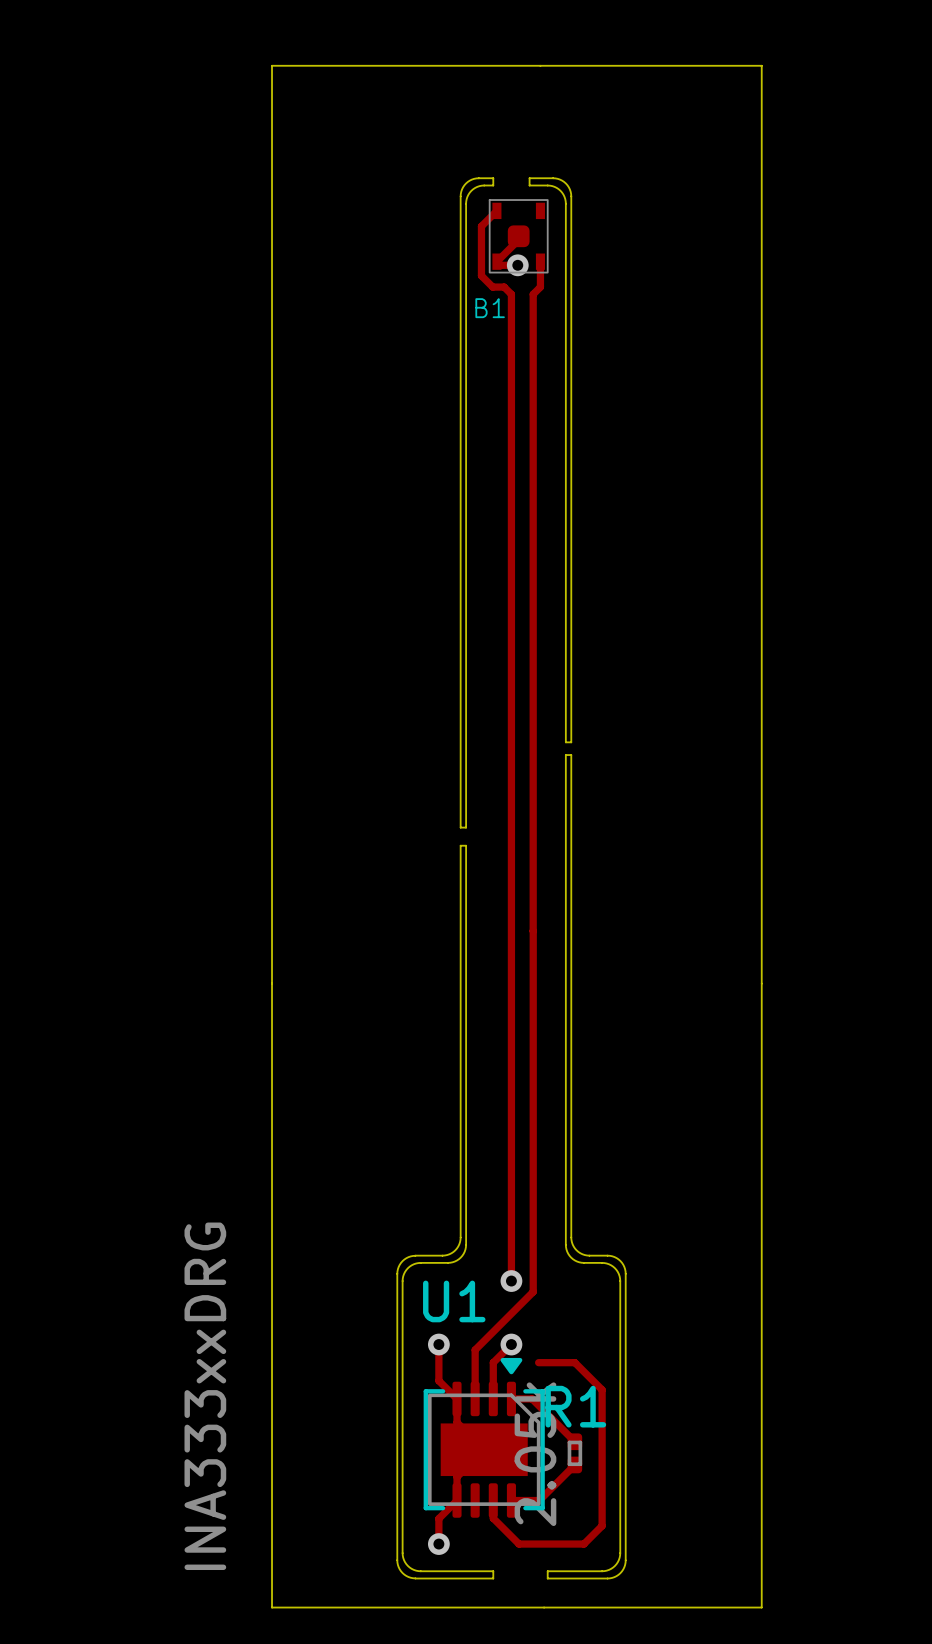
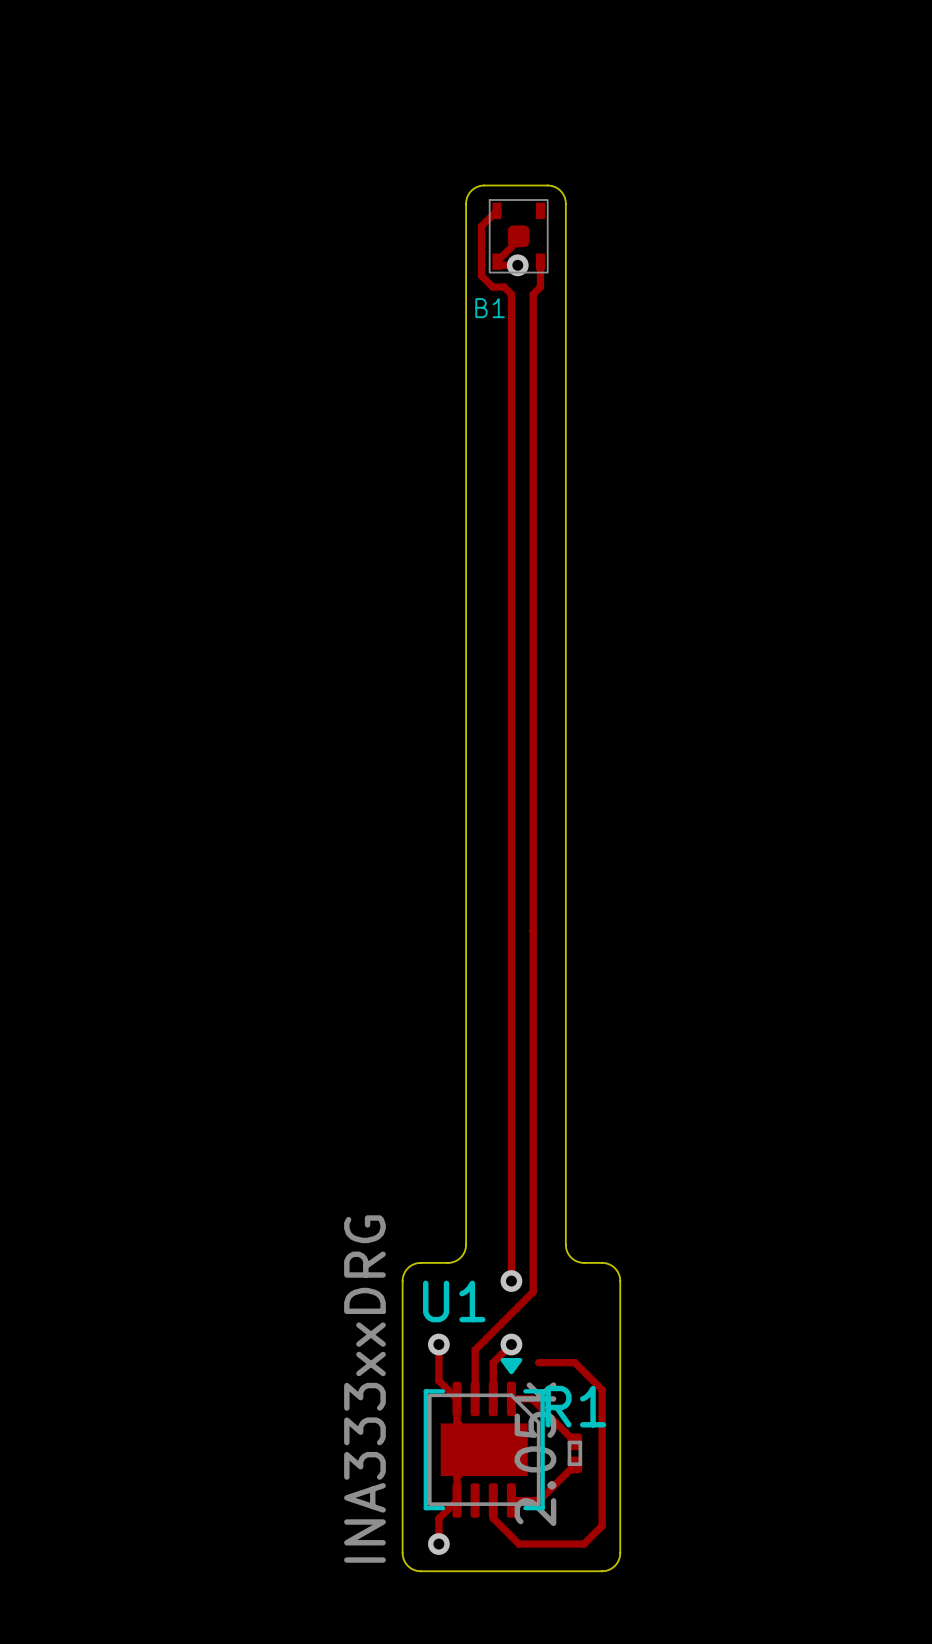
board edge: (272, 65) (761, 65) (761, 1607) (272, 1607) (272, 65) -> none
board edge: (493, 185) (493, 178) (474, 178) (464, 185) (460, 196) (460, 827) (466, 827) -> (466, 845) (466, 827)
board edge: (529, 185) (529, 178) (557, 178) (567, 185) (571, 196) (571, 742) (565, 742) -> (529, 185) (493, 185)
board edge: (565, 755) (571, 755) (571, 1239) (575, 1248) (580, 1253) (587, 1255) (614, 1257) (621, 1262) (625, 1271) (625, 1560) (620, 1573) (609, 1578) (547, 1578) (547, 1571) -> (565, 755) (565, 742)
board edge: (466, 845) (460, 845) (460, 1239) (456, 1248) (451, 1253) (444, 1255) (410, 1256) (402, 1261) (397, 1271) (397, 1560) (402, 1573) (413, 1578) (493, 1578) (493, 1571) -> (547, 1571) (493, 1571)
U1 value position: INA333xxDRG (205, 1396) -> INA333xxDRG (364, 1389)

